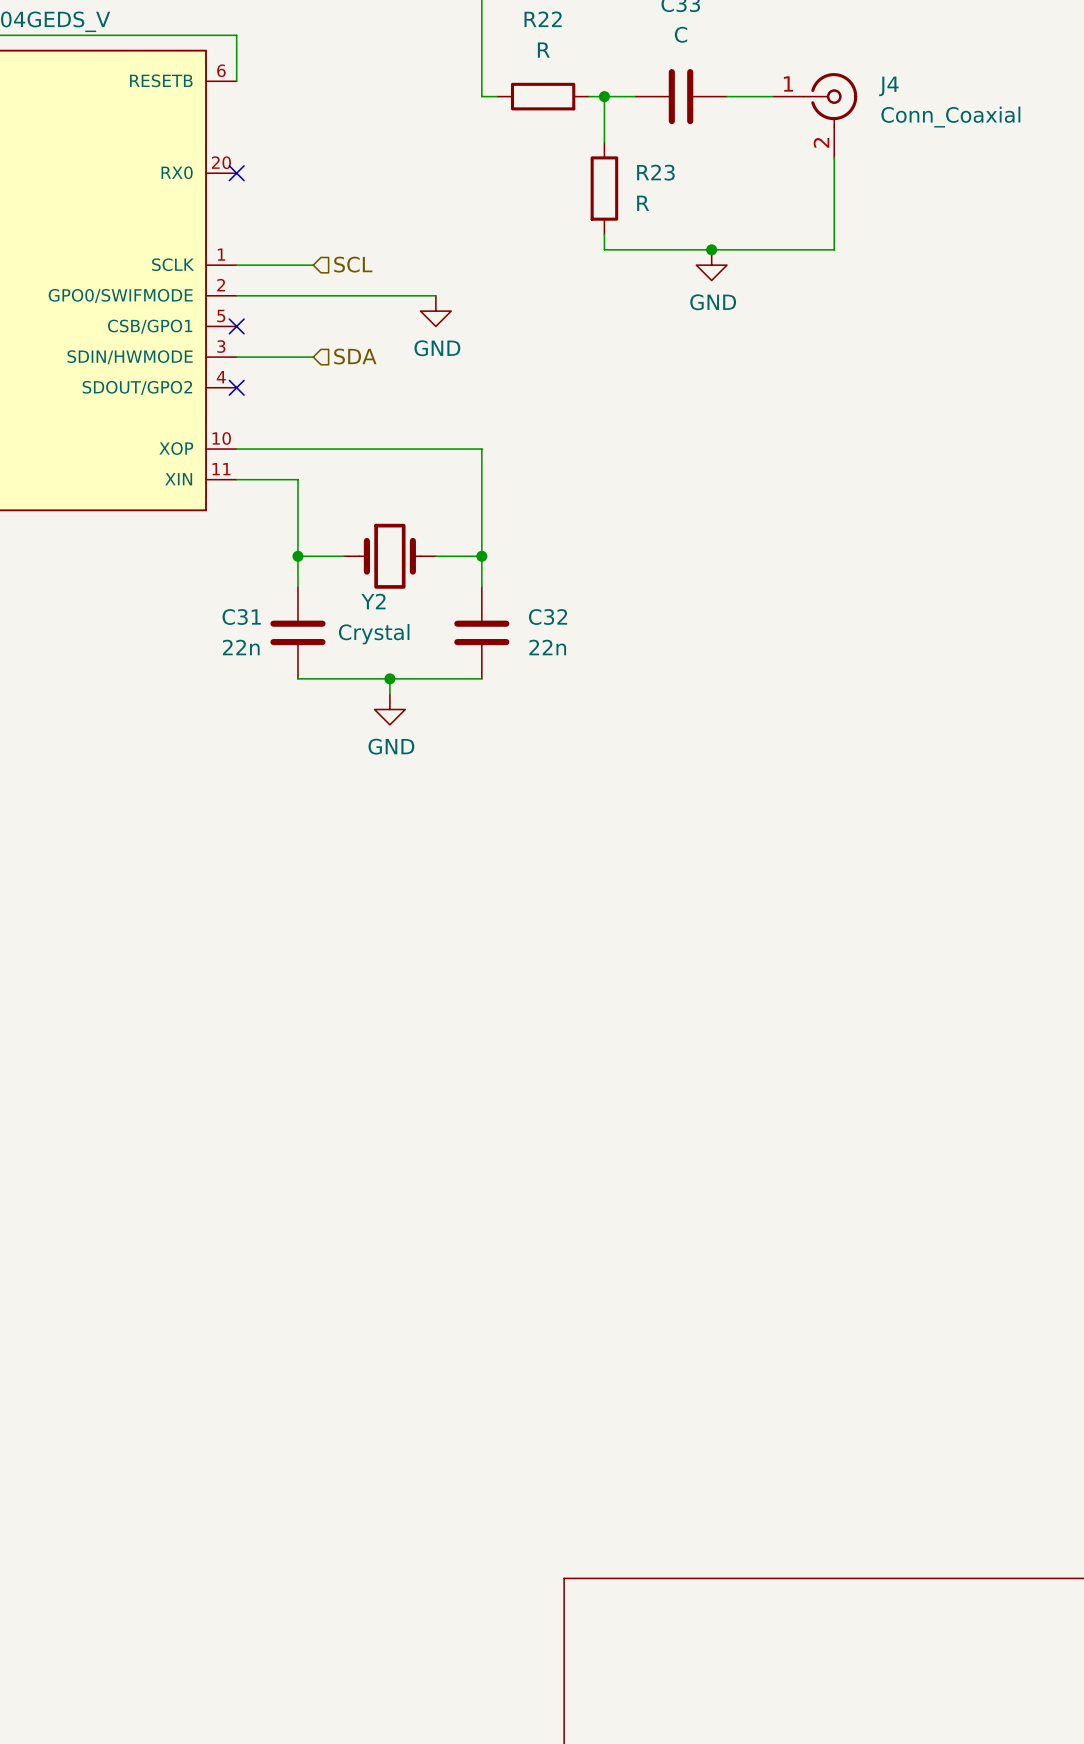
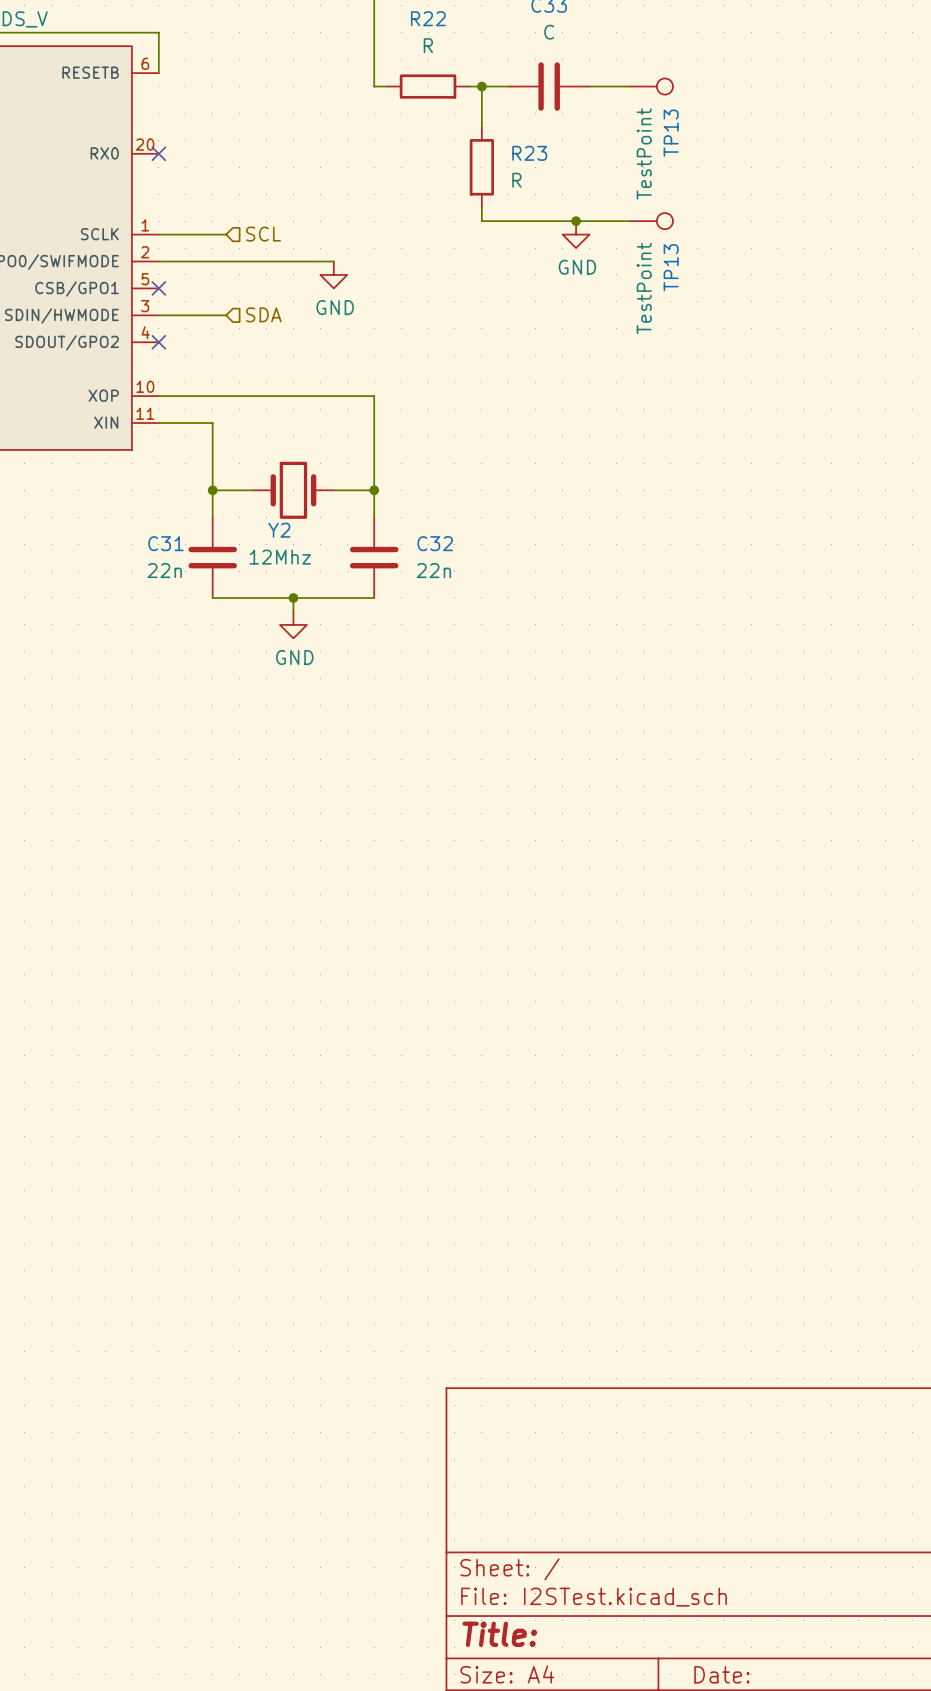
TP13: none -> TestPoint (651, 86)
J4: Conn_Coaxial (815, 115) -> none
wire: (834, 157) (834, 249) (772, 249) -> none
TP13: none -> TestPoint (651, 221)
Y2 value: Crystal (374, 634) -> 12Mhz (280, 557)

